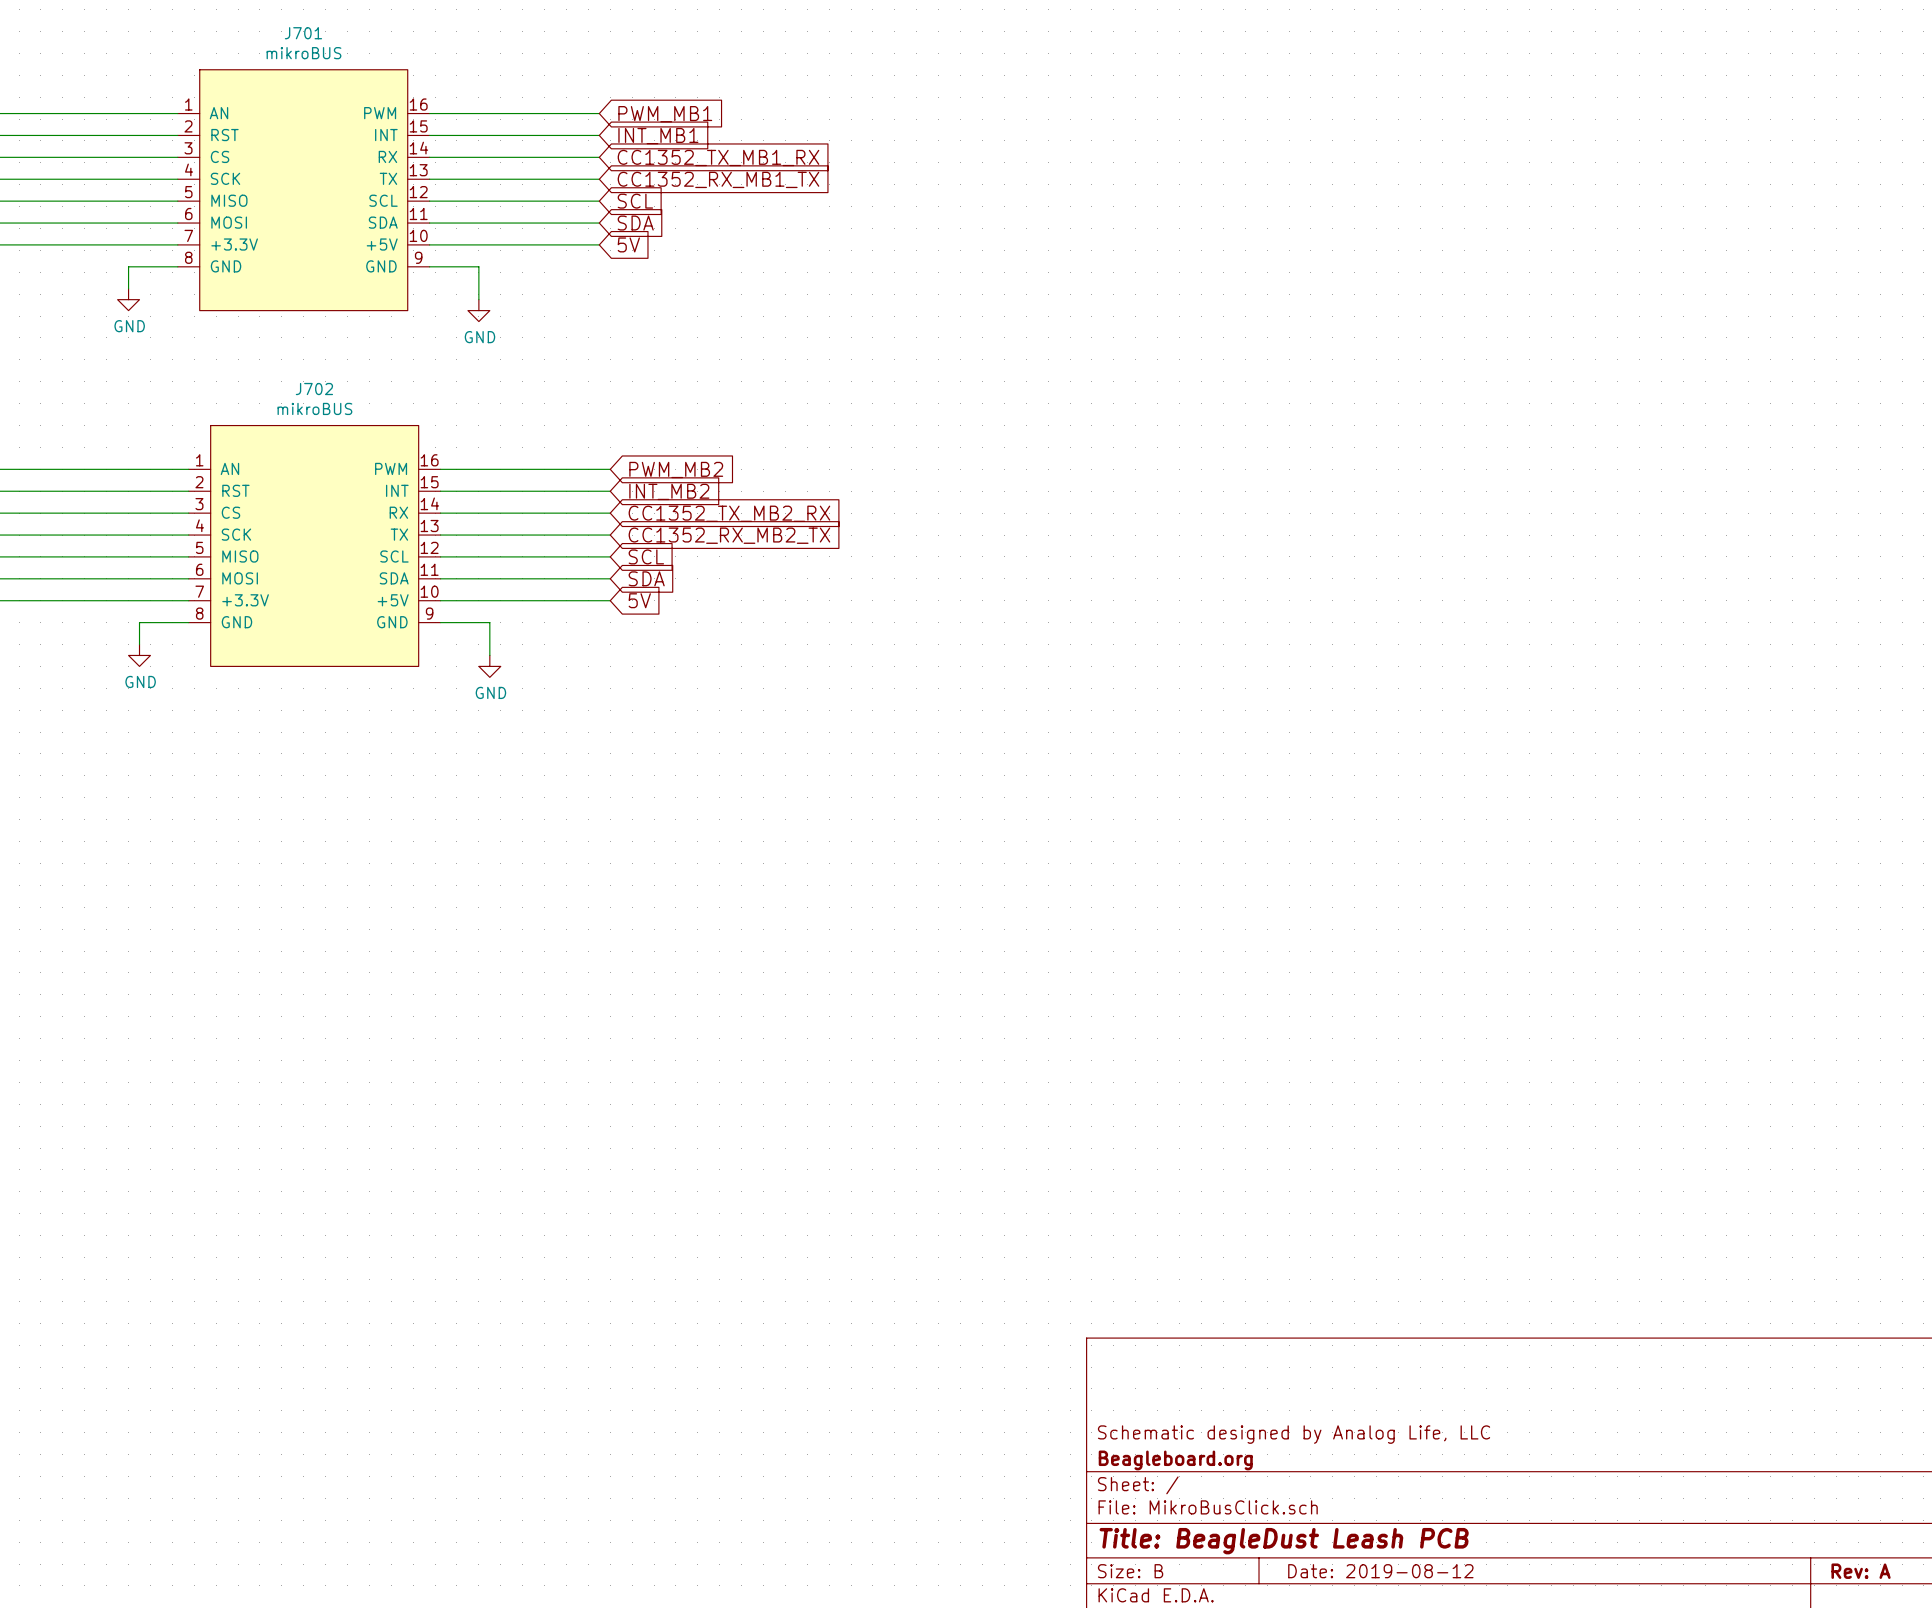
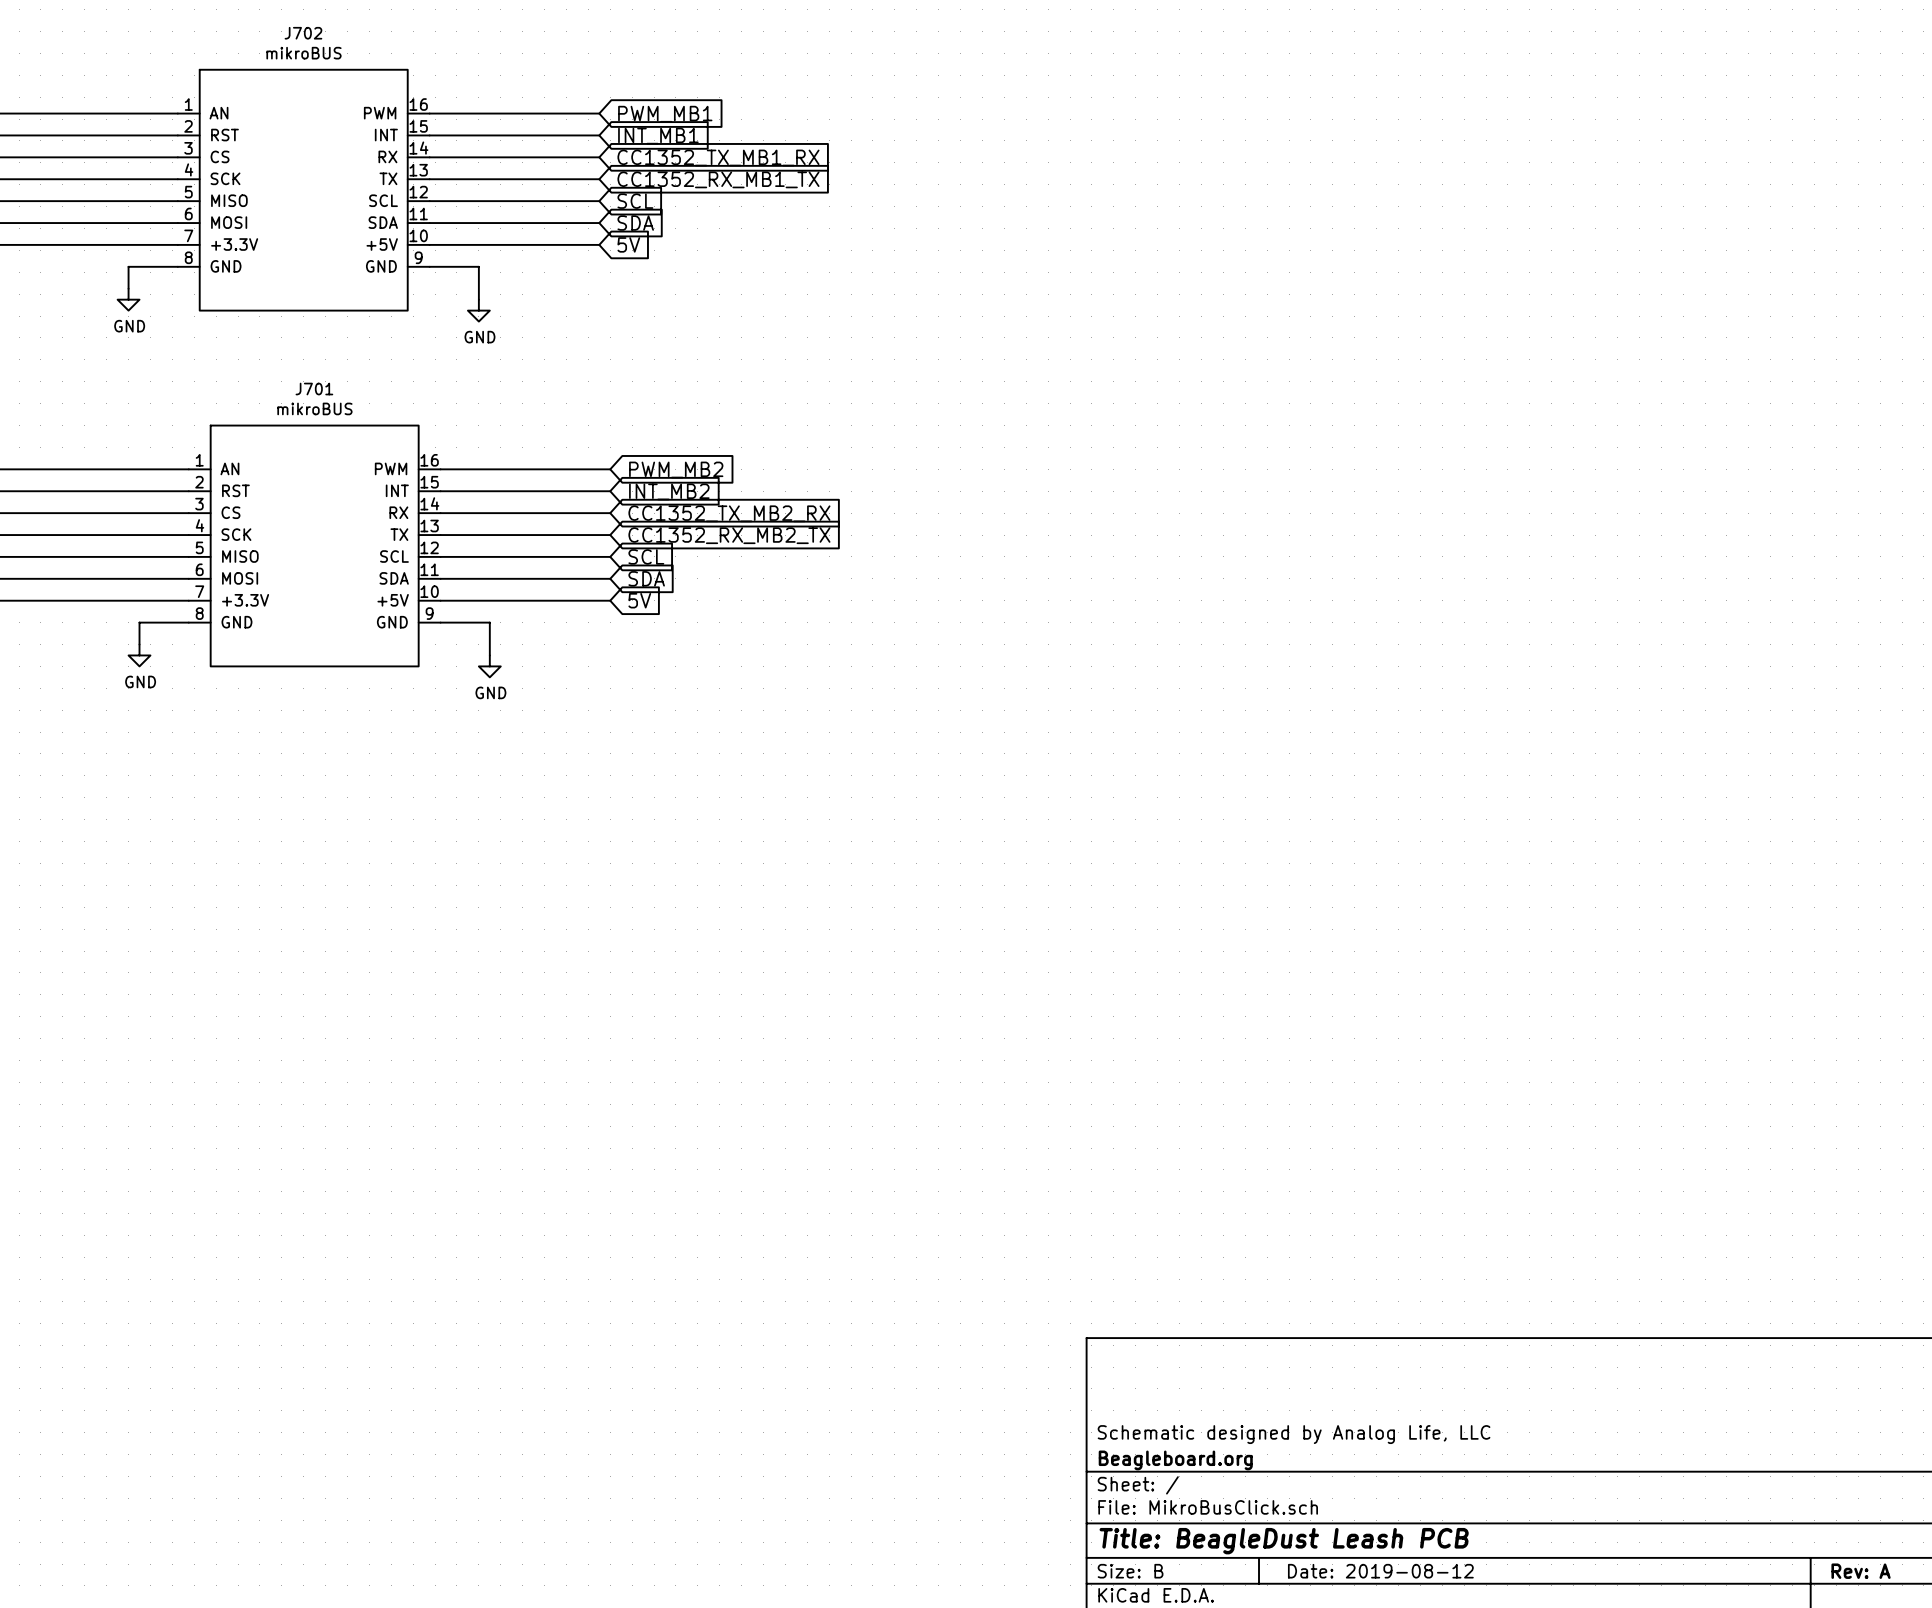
J701 name: J701 (303, 33) -> J702 (303, 33)
J702 name: J702 (314, 389) -> J701 (314, 389)

